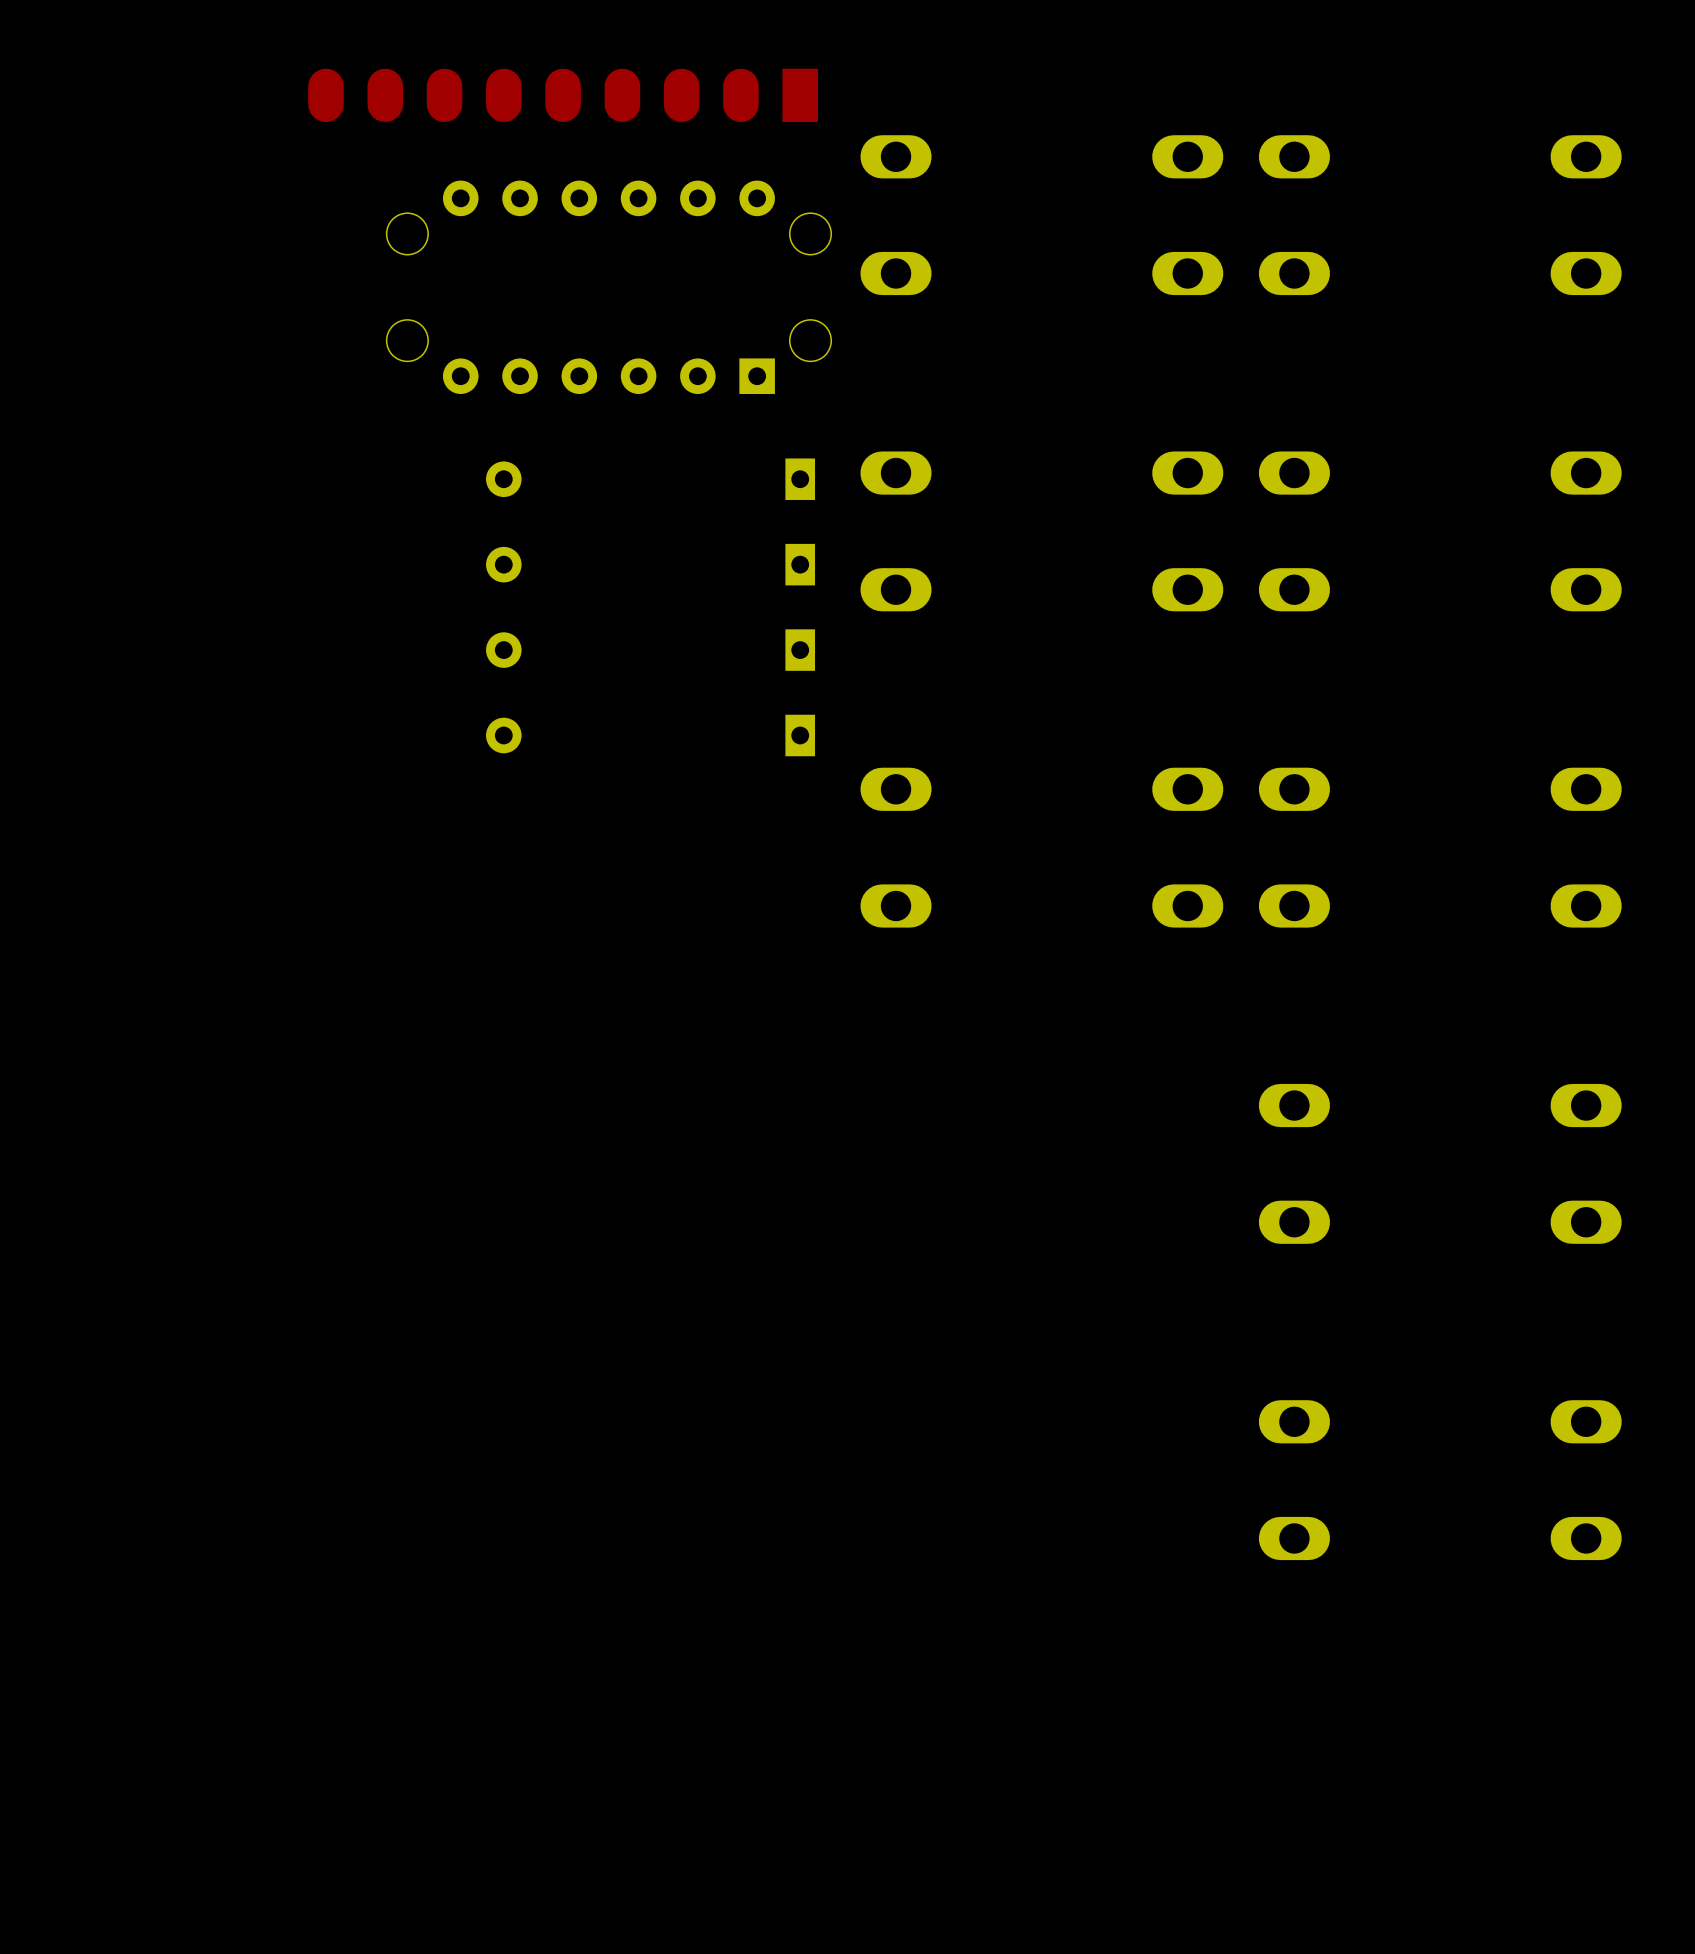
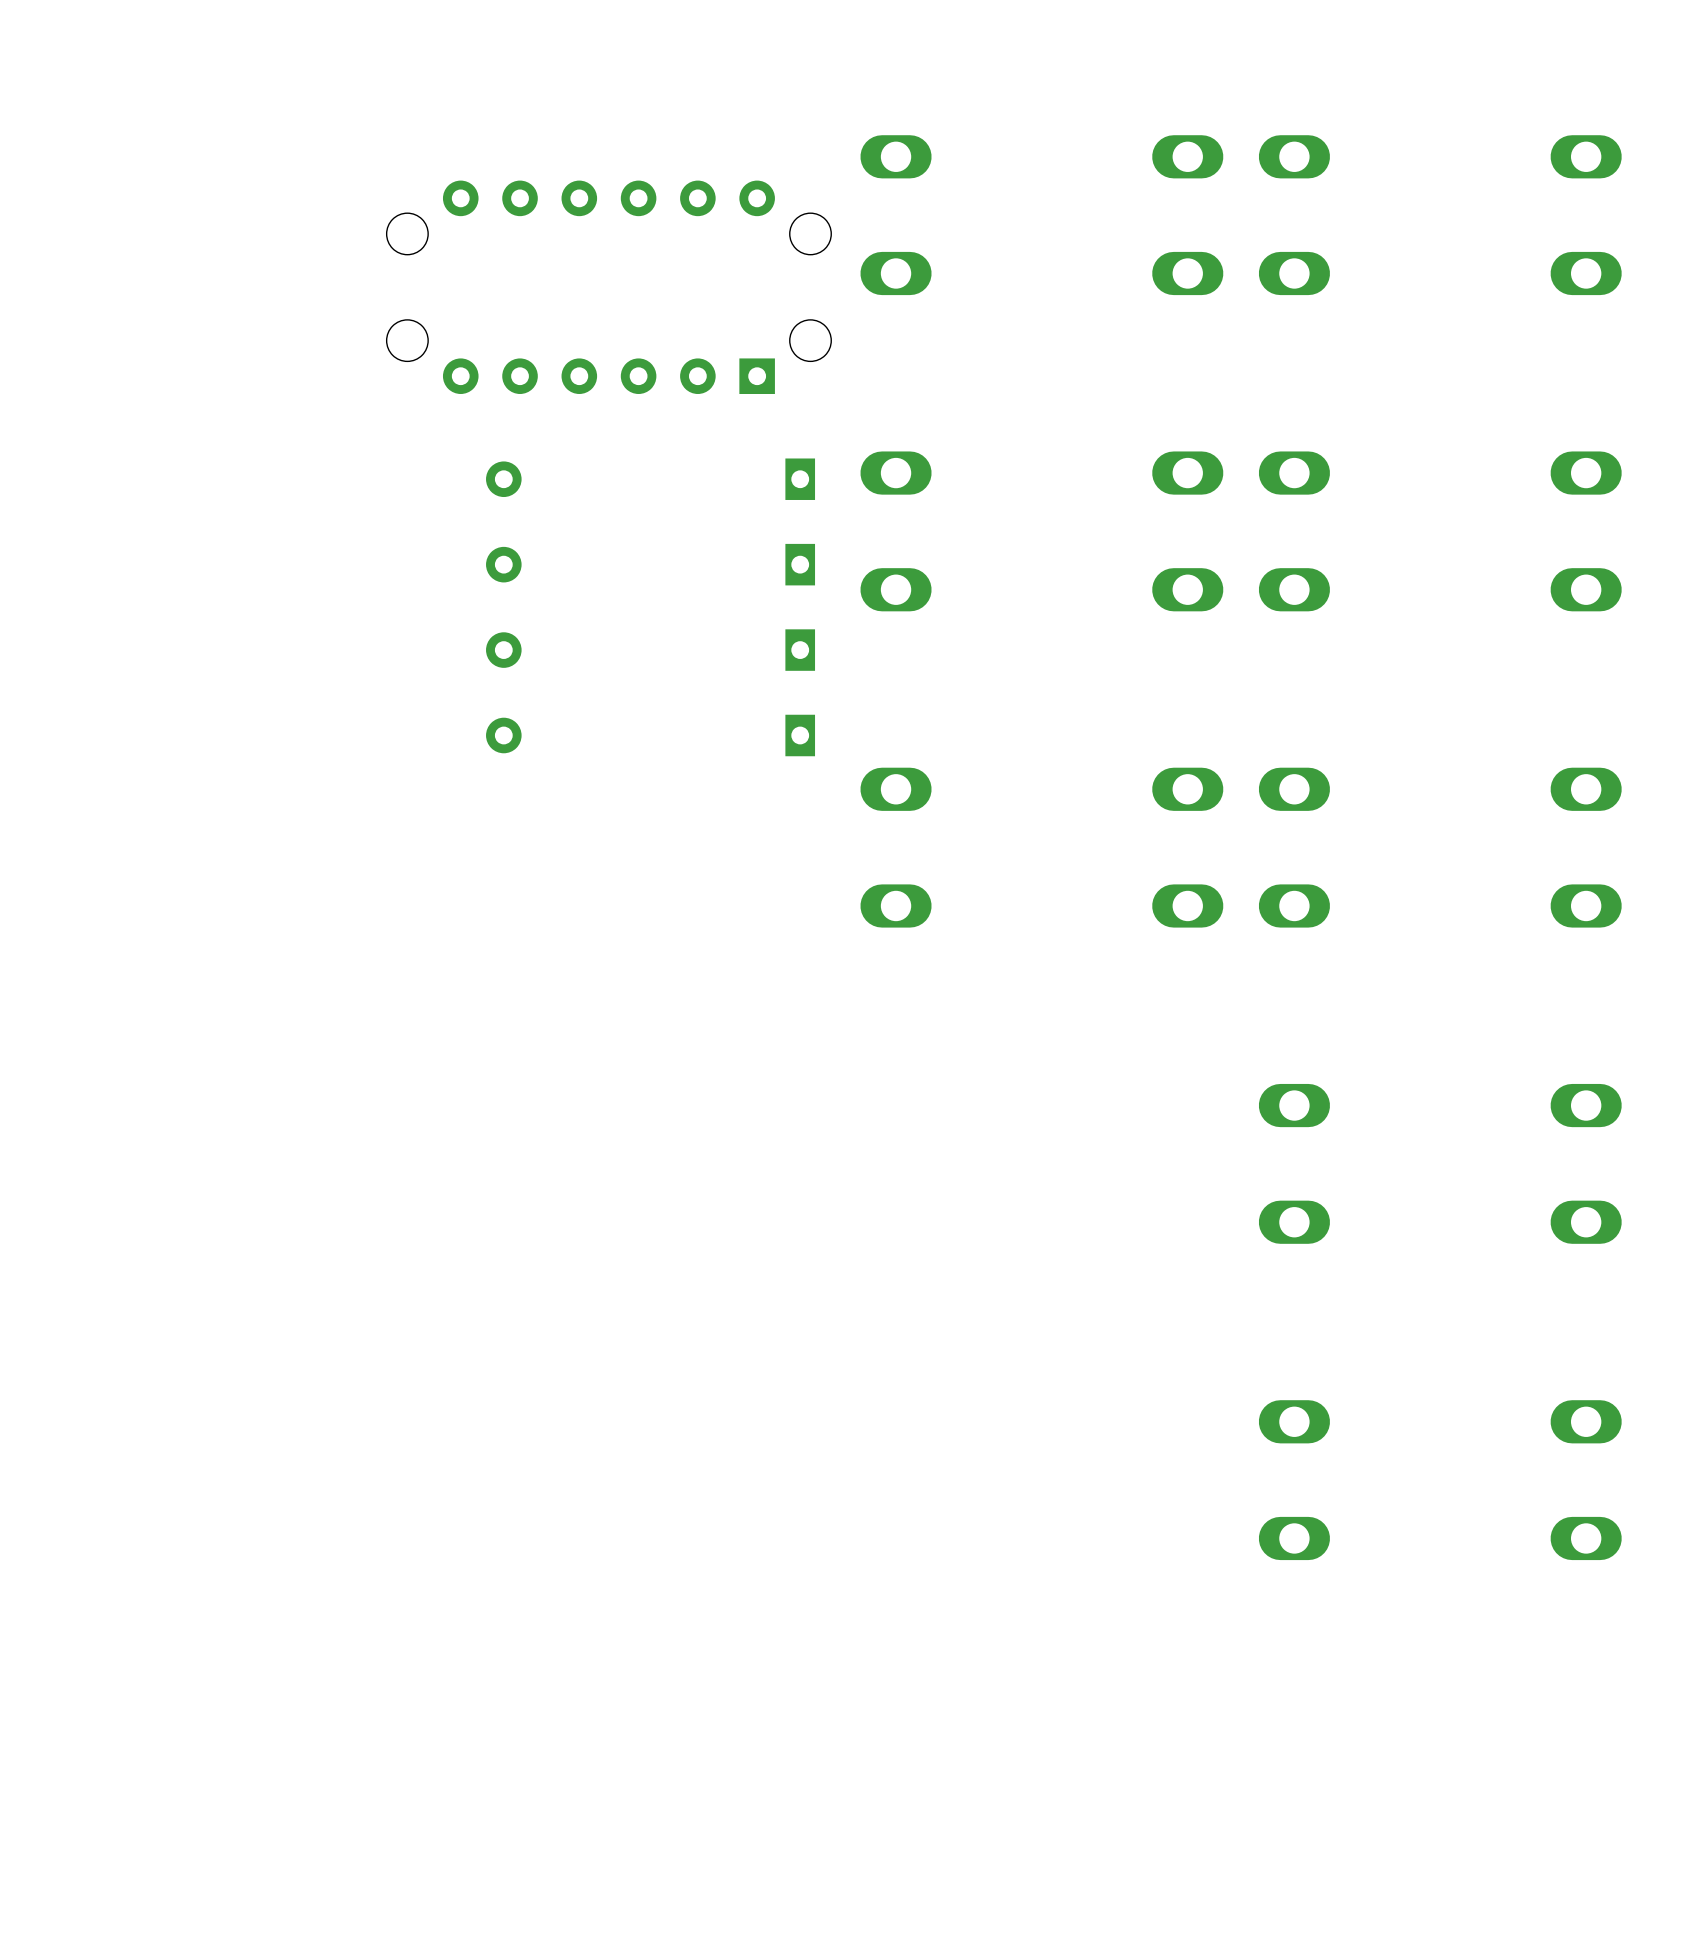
part: (563, 95) -> none

